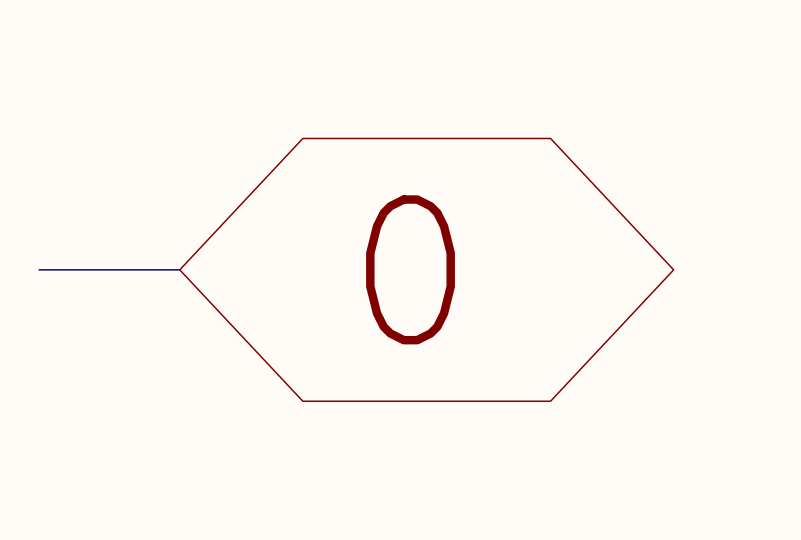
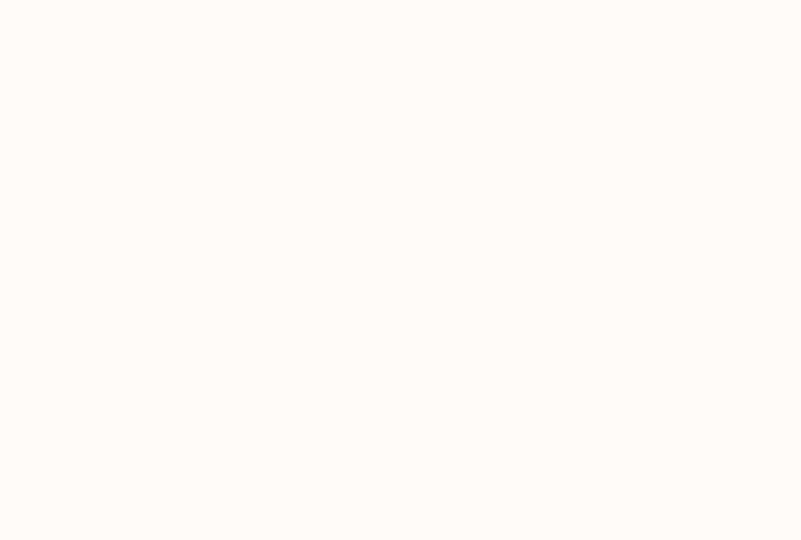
wire: (39, 269) (179, 269) -> none
global label: 0 (410, 269) -> none

